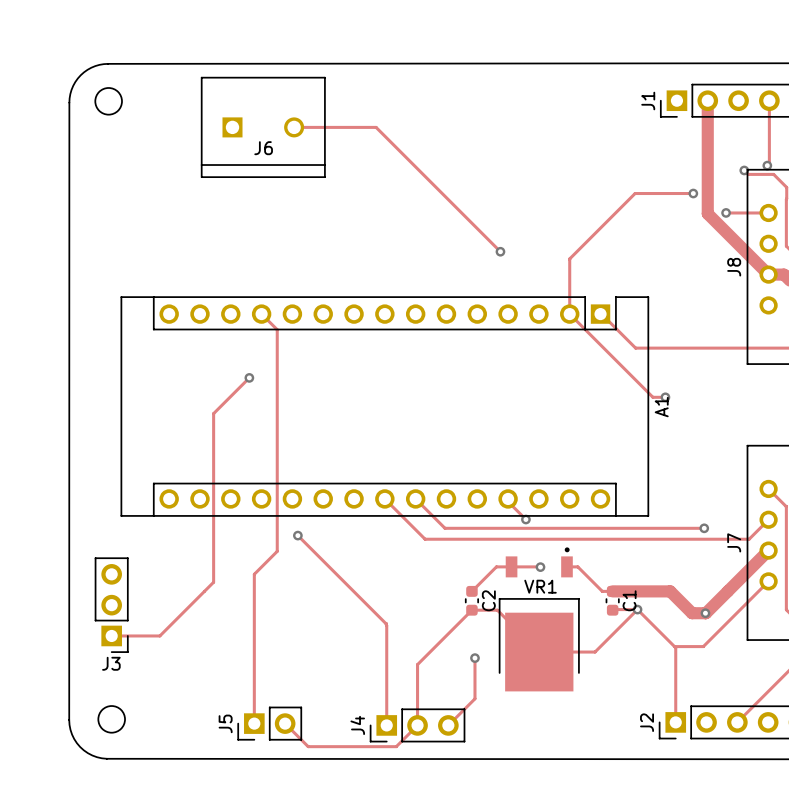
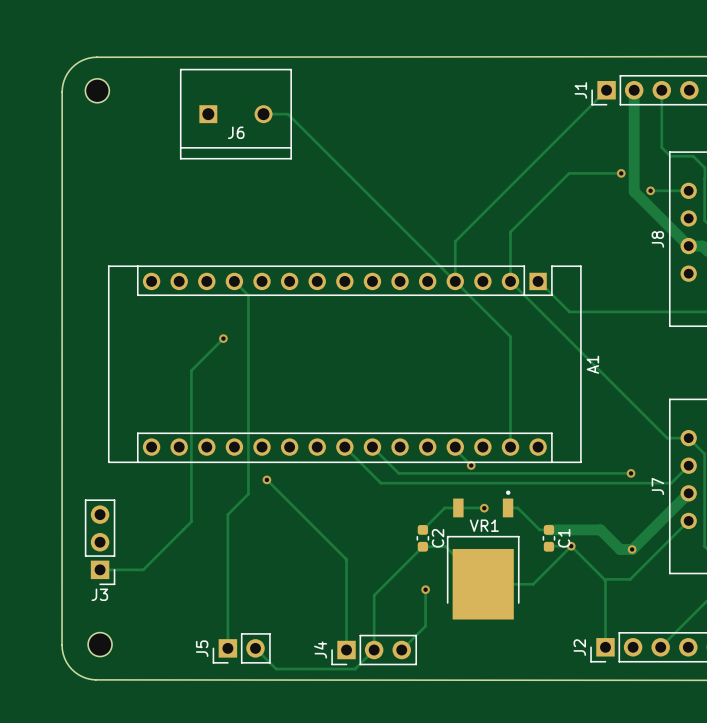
track: none -> (606, 90) (455, 241) (455, 281)
track: none -> (661, 90) (661, 147) (666, 152)
track: (769, 100) (769, 163) (767, 165) -> none
track: (321, 127) (376, 127) (500, 251) -> (288, 114) (510, 336) (510, 447)
via: (767, 165) -> none
via: (744, 170) -> none
via: (500, 251) -> none
track: (652, 397) (665, 397) -> (585, 356) (667, 438) (688, 438)
via: (665, 397) -> none

